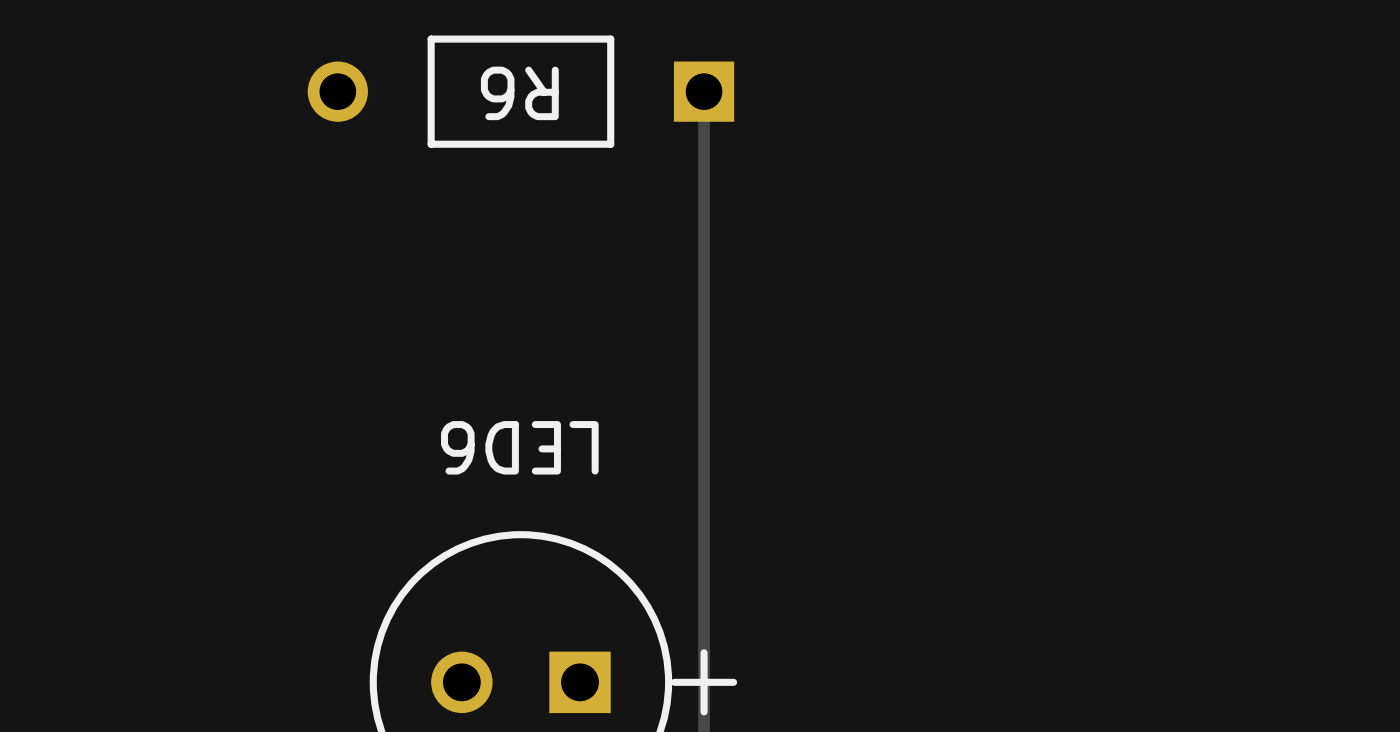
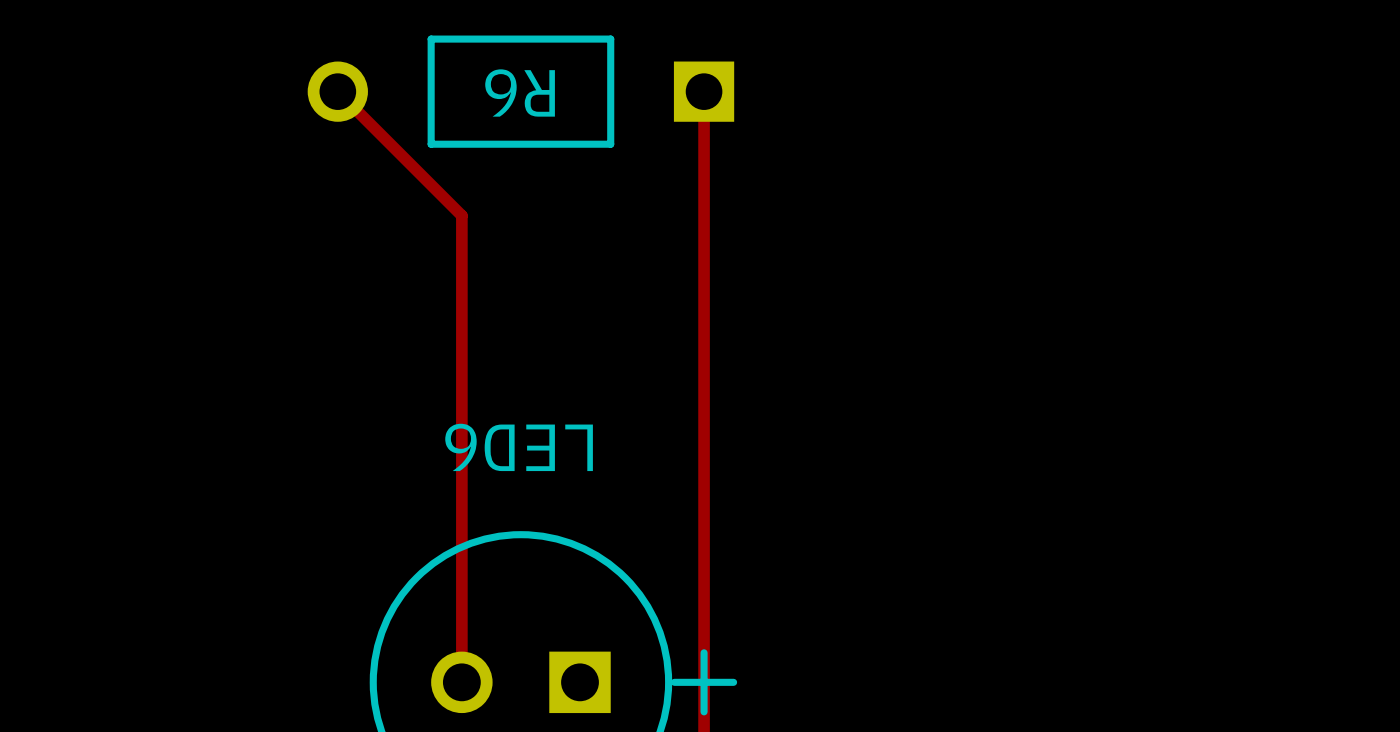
track: none -> (337, 91) (461, 215) (461, 682)

